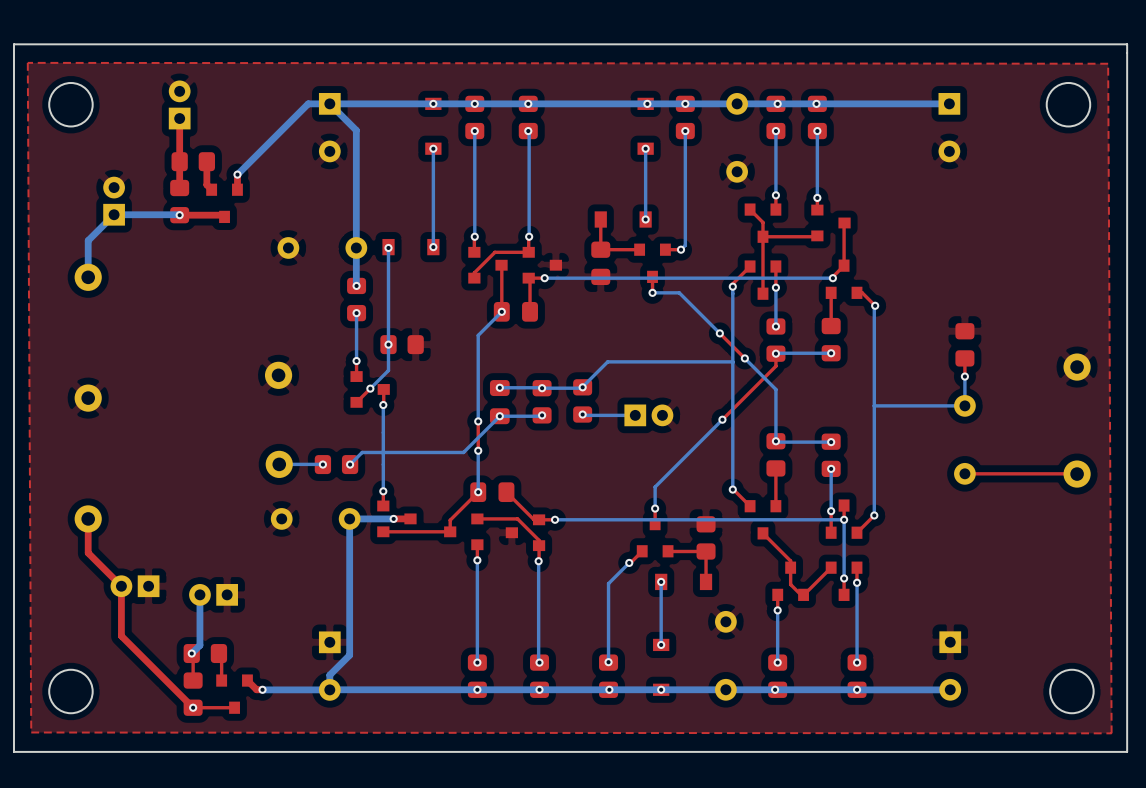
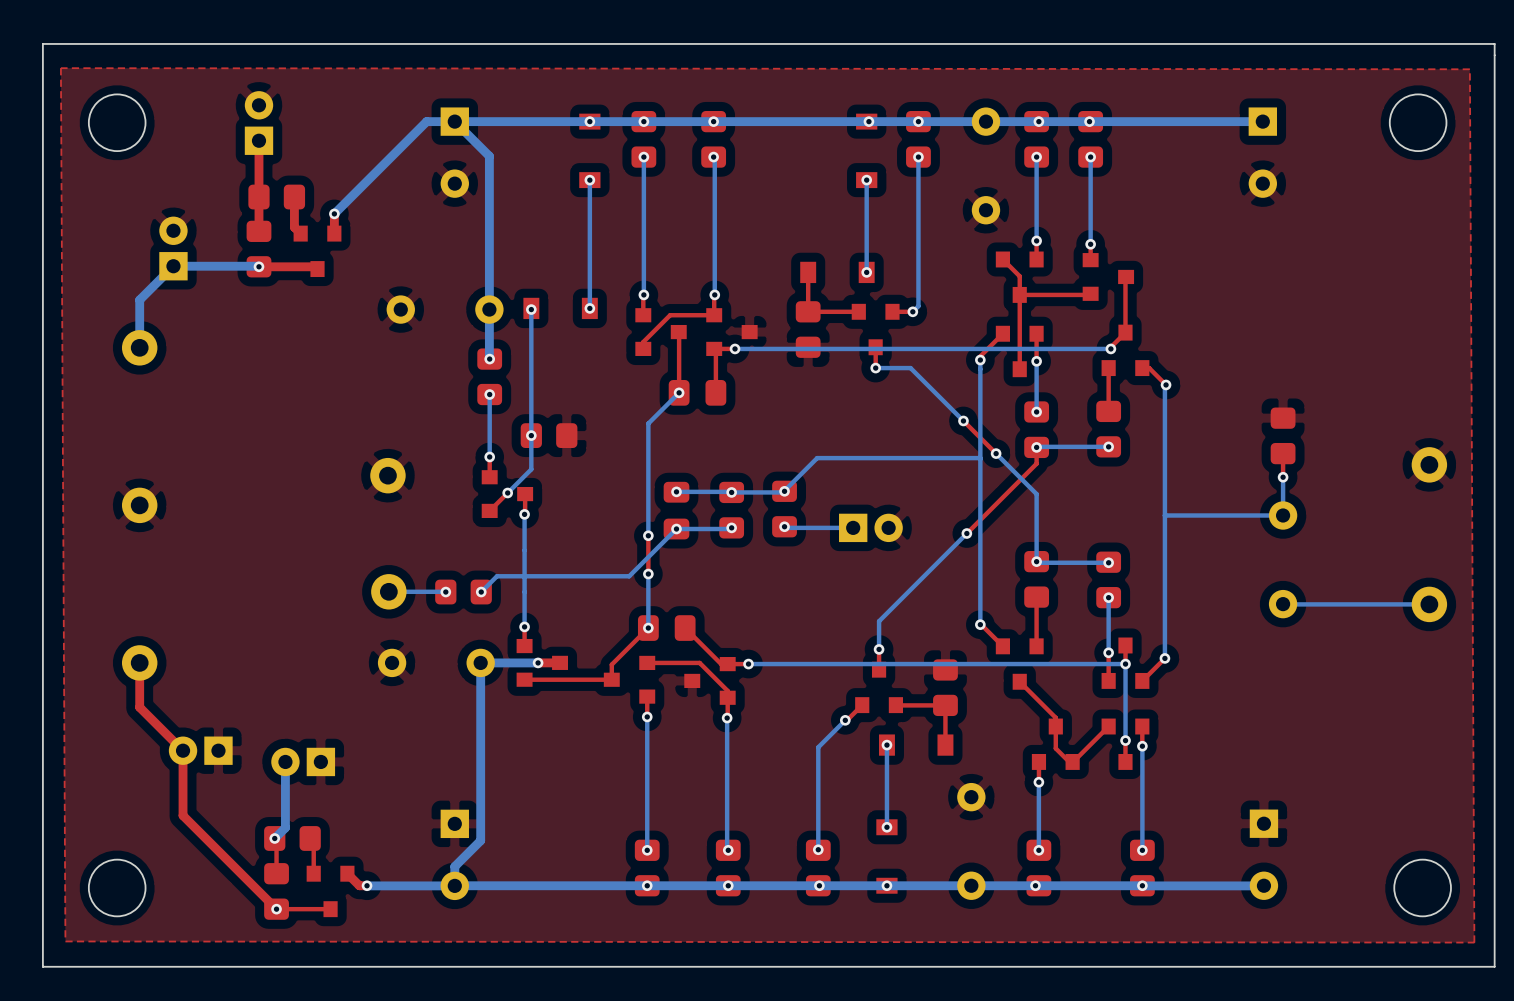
bottom track: none -> (1283, 604) (1429, 604)
top track: (1076, 473) (964, 473) -> none

